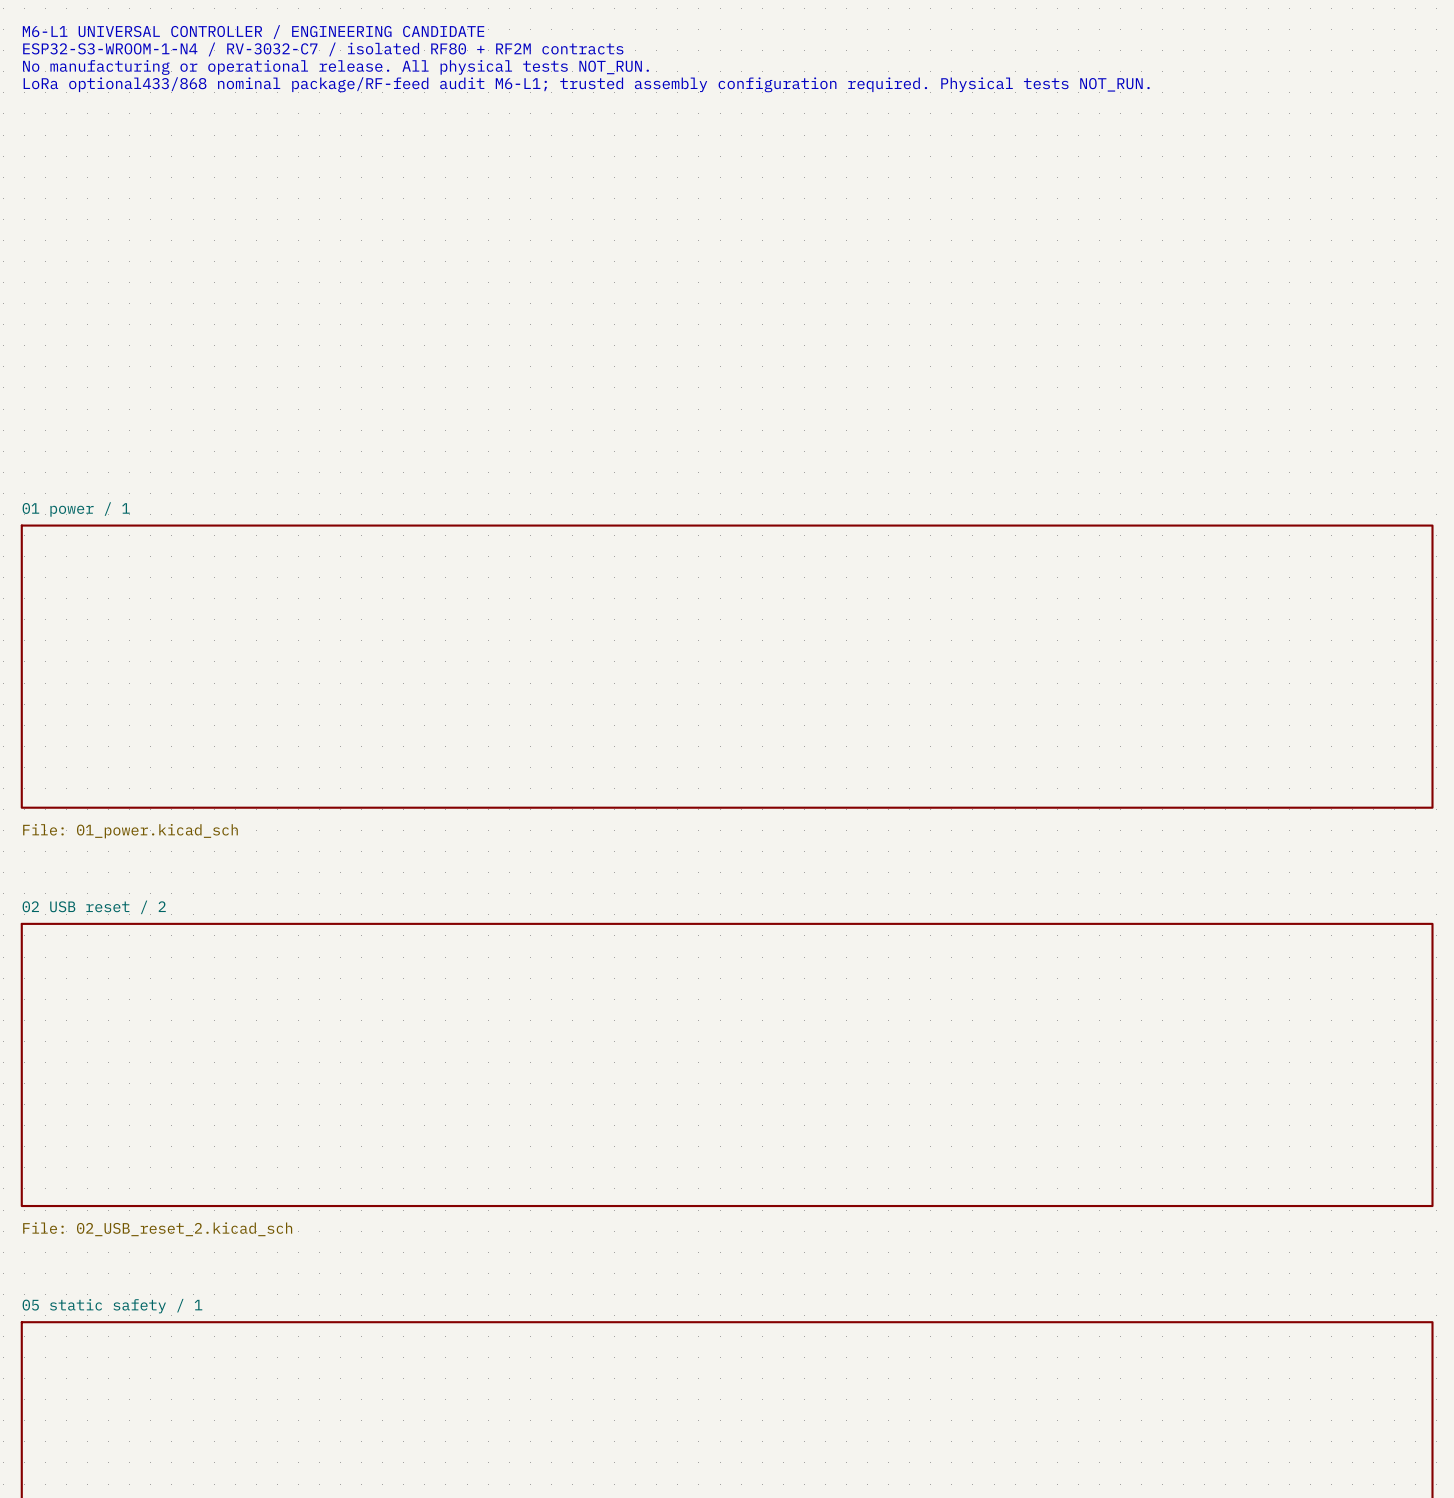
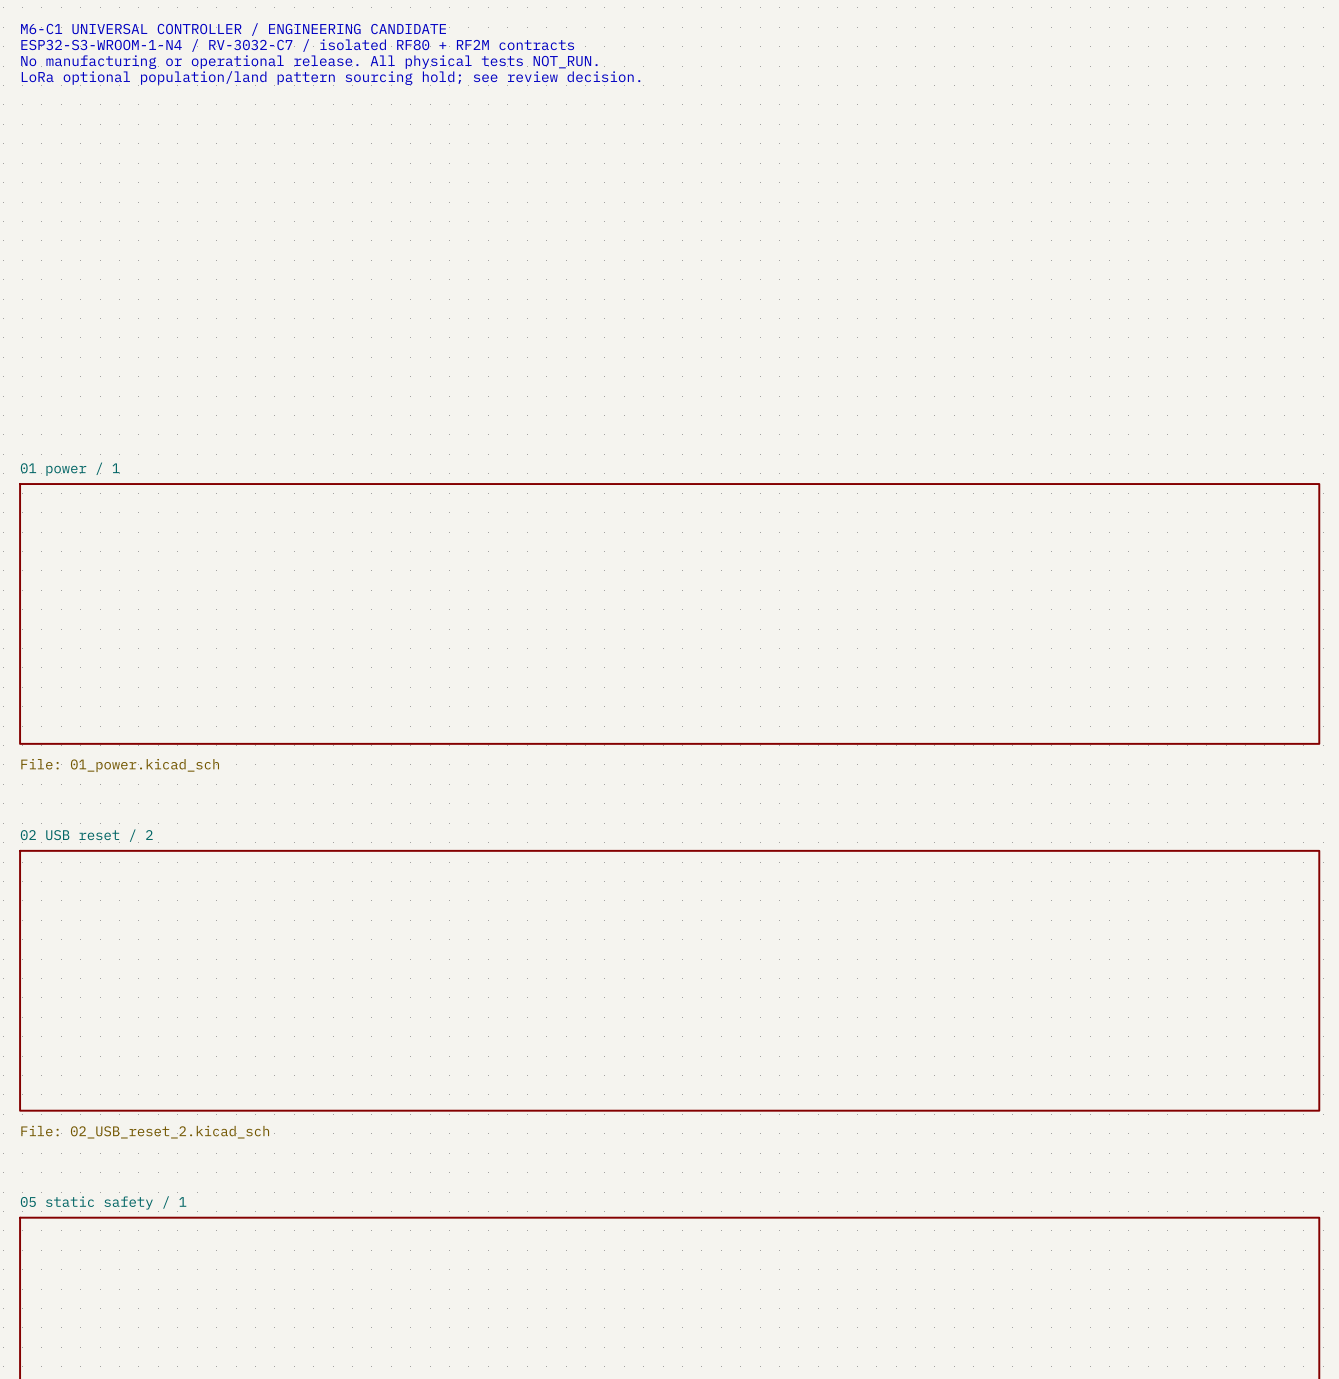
text: M6-L1 UNIVERSAL CONTROLLER / ENGINEERING CANDIDATE (253, 32) -> M6-C1 UNIVERSAL CONTROLLER / ENGINEERING CANDIDATE (233, 29)
text: LoRa optional433/868 nominal package/RF-feed audit M6-L1; trusted assembly configuration required. Physical tests NOT_RUN. (586, 84) -> LoRa optional population/land pattern sourcing hold; see review decision. (331, 78)

